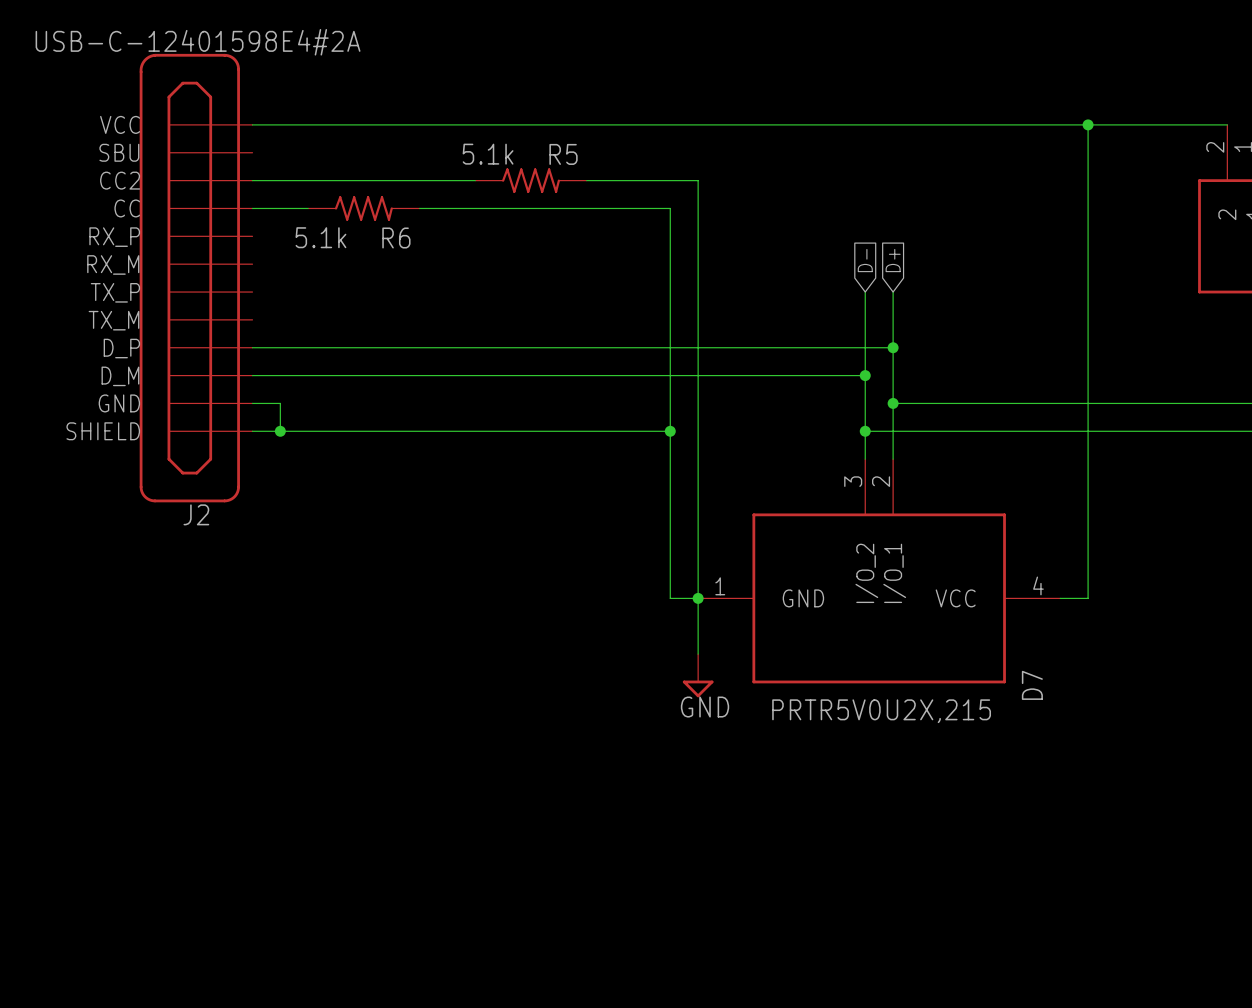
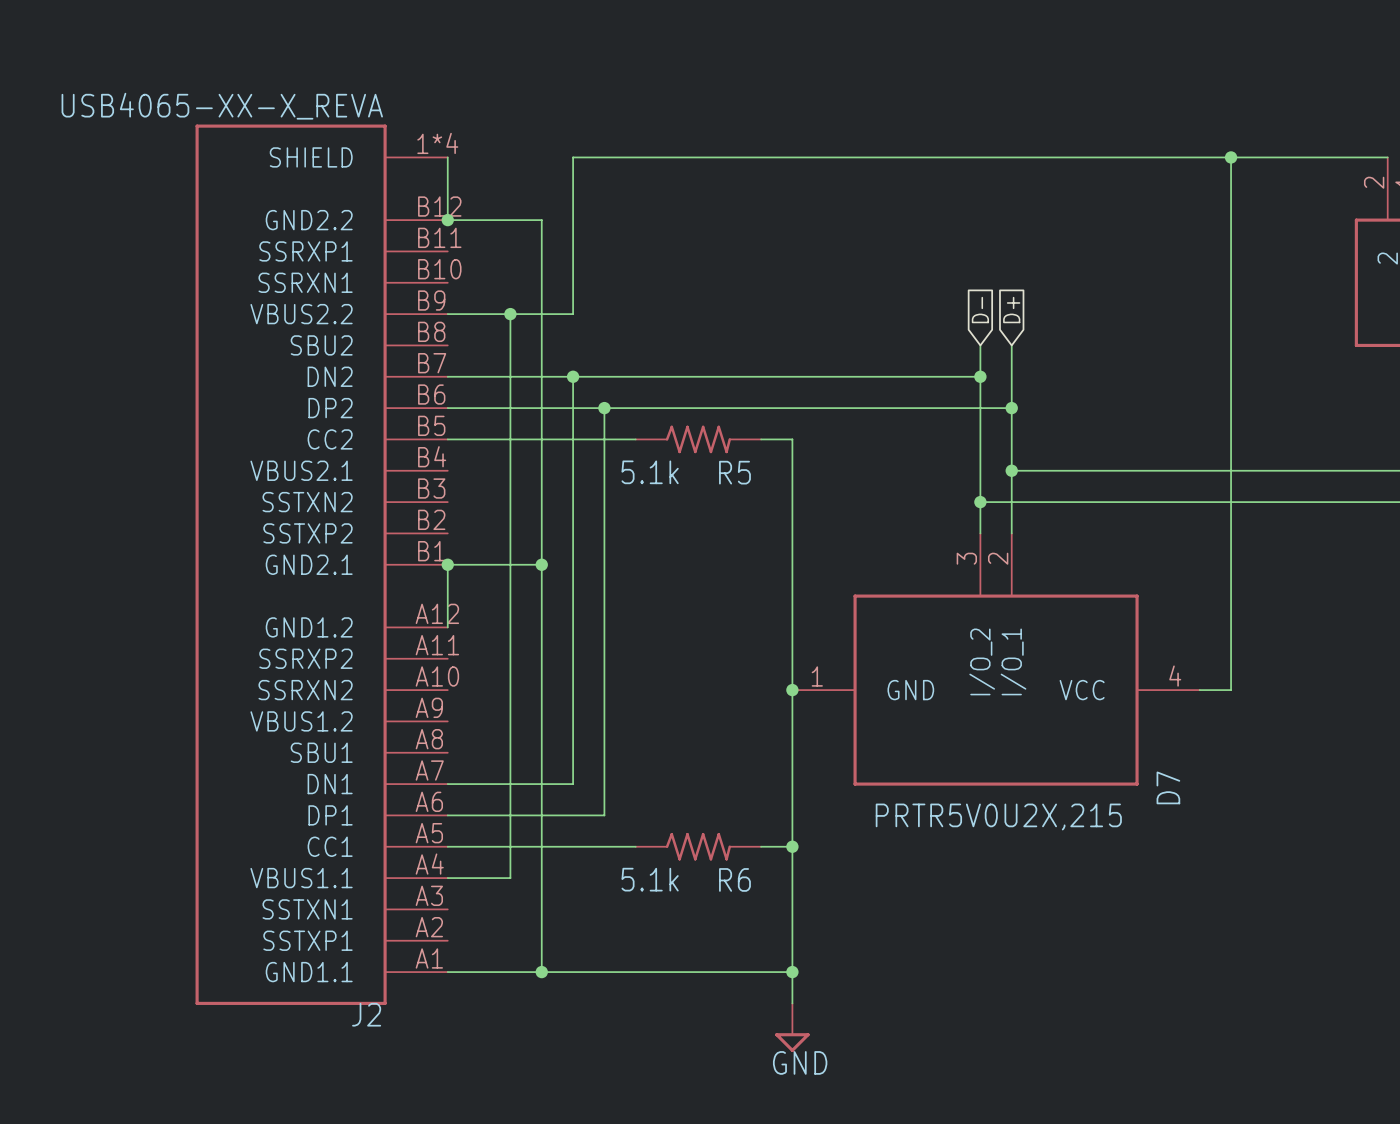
J2 value: USB-C-12401598E4#2A (198, 42) -> USB4065-XX-X_REVA (222, 106)
J2 symbol: [139, 53, 253, 503] -> [195, 124, 448, 1005]
wire: (252, 124) (503, 124) -> (447, 314) (573, 314) (573, 157)
R5 value position: 5.1k (488, 154) -> 5.1k (650, 472)
R5 name position: R5 (563, 154) -> R5 (734, 472)
wire: (252, 180) (391, 180) -> (447, 157) (447, 220)
junction: none -> (447, 220)
wire: none -> (541, 220) (541, 972)
R5 position: (531, 180) -> (698, 439)
wire: (586, 180) (698, 180) (698, 375) (865, 375) -> none
wire: (252, 208) (308, 208) -> none
R6 position: (363, 208) -> (698, 846)
wire: (419, 208) (670, 208) (670, 598) (698, 598) -> none
wire: none -> (510, 314) (510, 878) (447, 878)
junction: none -> (510, 314)
wire: none -> (447, 376) (980, 376)
wire: none -> (573, 376) (573, 784) (447, 784)
junction: none -> (573, 376)
wire: (252, 347) (391, 347) -> none
wire: none -> (604, 408) (604, 815) (447, 815)
junction: none -> (604, 408)
wire: (252, 375) (391, 375) -> none
junction position: (865, 375) -> (980, 376)
wire: (252, 403) (280, 403) (280, 431) -> none
wire: (252, 431) (670, 431) -> none
junction: (280, 431) -> none
junction: (670, 431) -> none
junction: none -> (447, 564)
wire: none -> (541, 564) (447, 564) (447, 627)
junction: none -> (541, 564)
J2 name position: J2 (196, 514) -> J2 (366, 1014)
wire: none -> (792, 752) (792, 1003)
power symbol position: GND (698, 675) -> GND (792, 1027)
wire: none -> (447, 846) (635, 846)
wire: none -> (761, 846) (792, 846)
junction: none -> (792, 846)
wire: none -> (447, 972) (792, 972)
junction: none -> (541, 972)
junction: none -> (792, 972)

